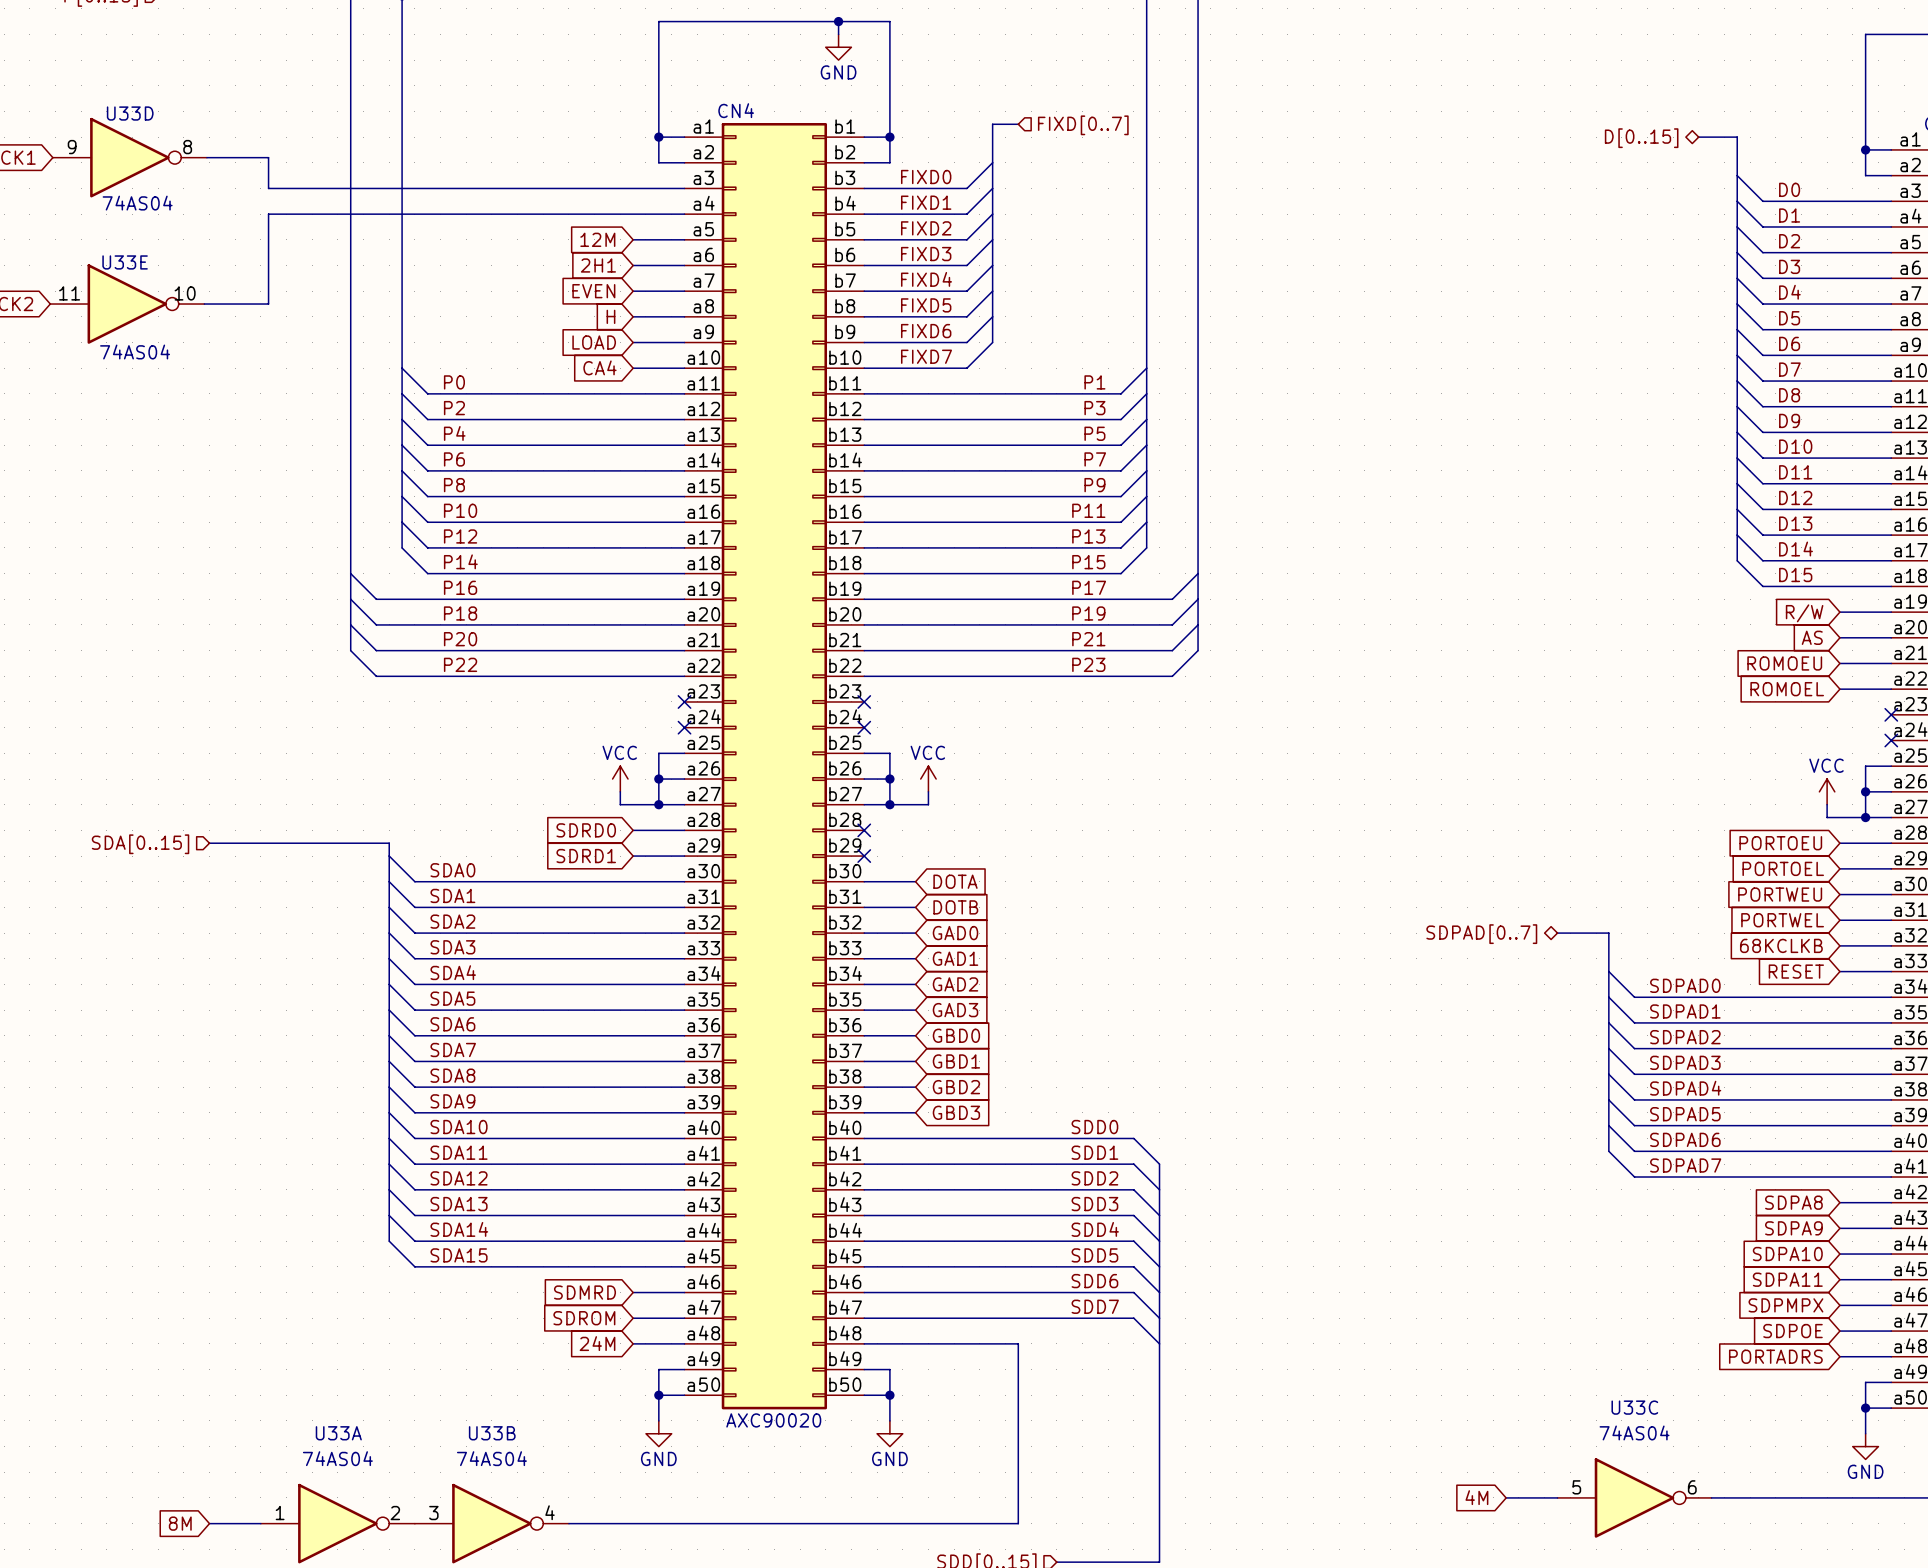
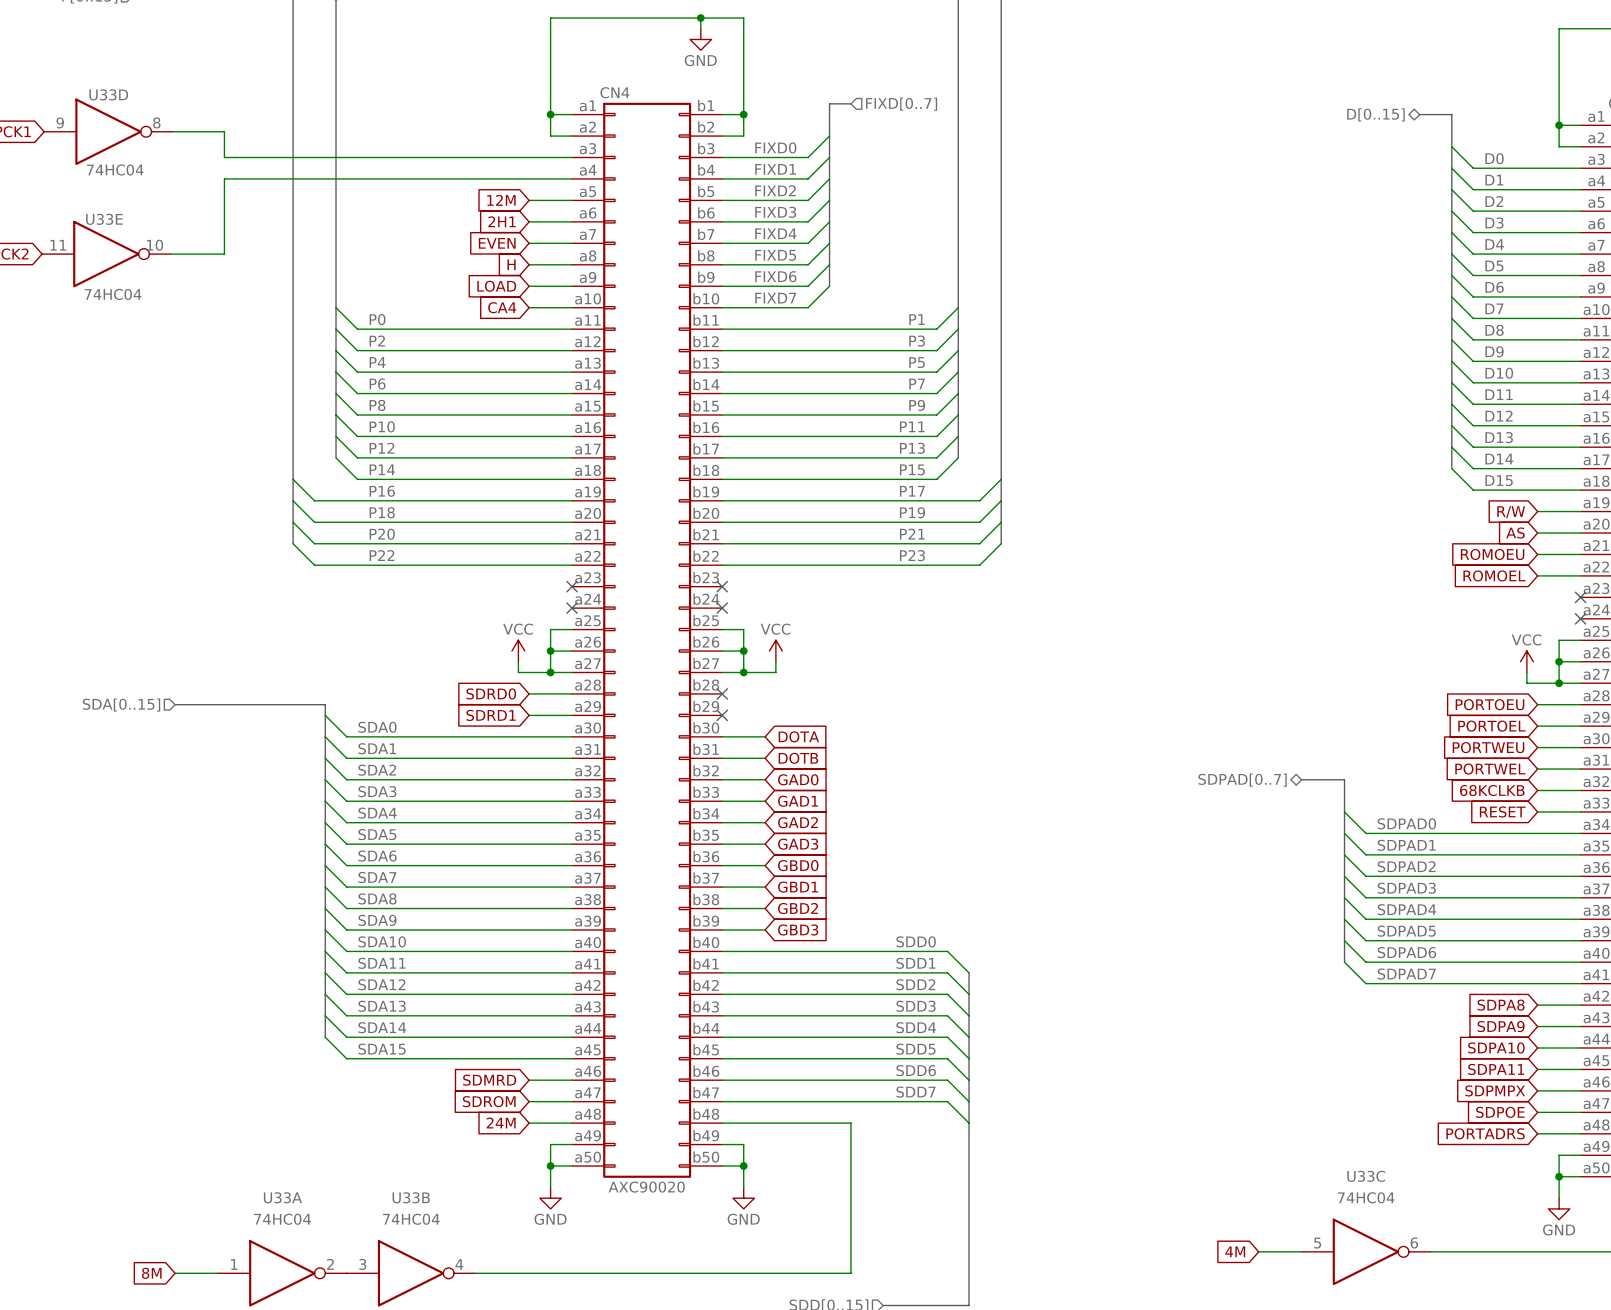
U33D value: 74AS04 (137, 203) -> 74HC04 (115, 169)
U33E value: 74AS04 (135, 352) -> 74HC04 (113, 294)
U33C value: 74AS04 (1634, 1432) -> 74HC04 (1366, 1197)
U33A value: 74AS04 (337, 1458) -> 74HC04 (282, 1219)
U33B value: 74AS04 (491, 1458) -> 74HC04 (411, 1219)

